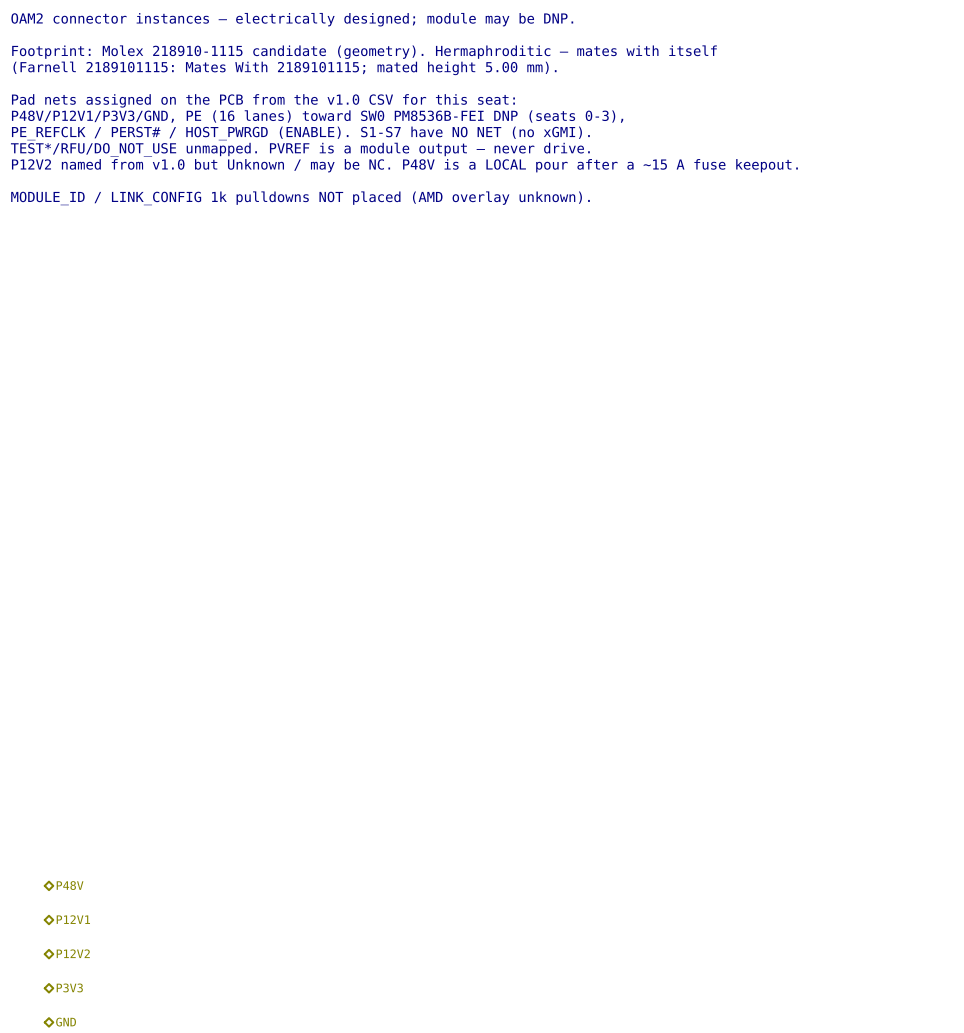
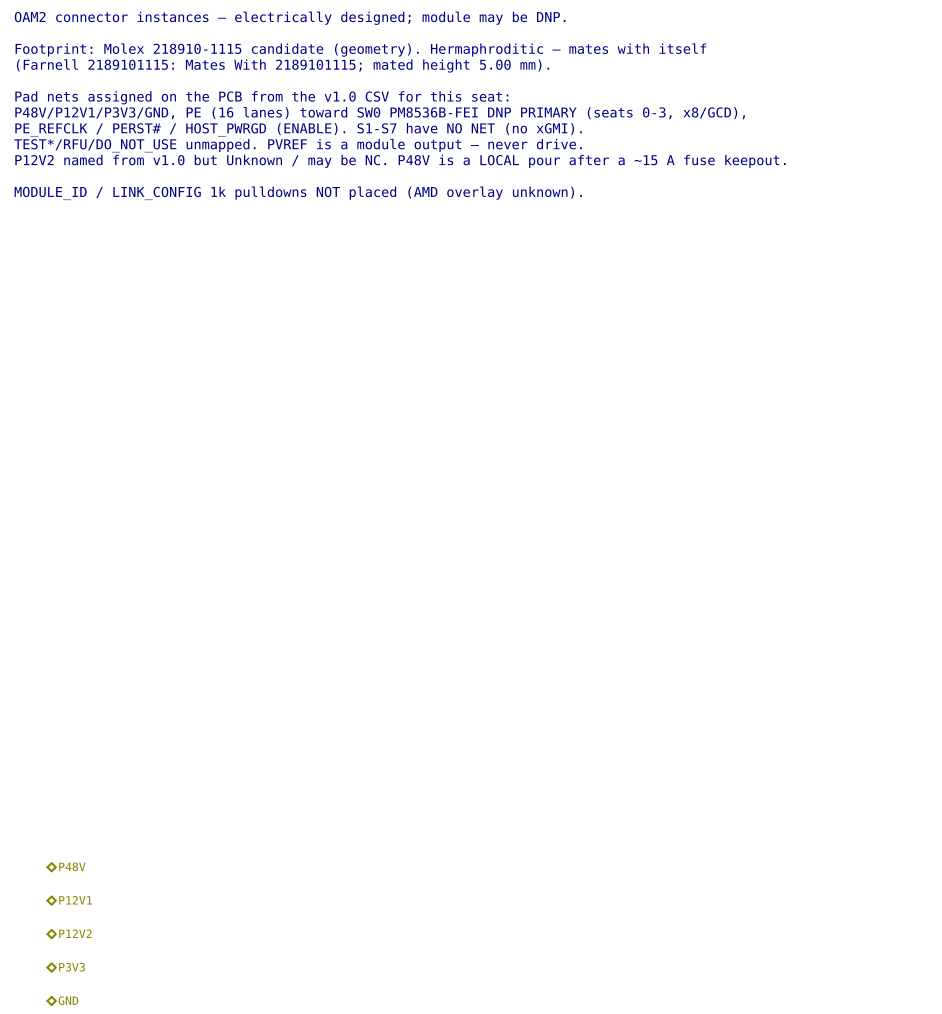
text: P48V/P12V1/P3V3/GND, PE (16 lanes) toward SW0 PM8536B-FEI DNP (seats 0-3), (317, 116) -> P48V/P12V1/P3V3/GND, PE (16 lanes) toward SW0 PM8536B-FEI DNP PRIMARY (seats 0-3, x8/GCD), (380, 113)

